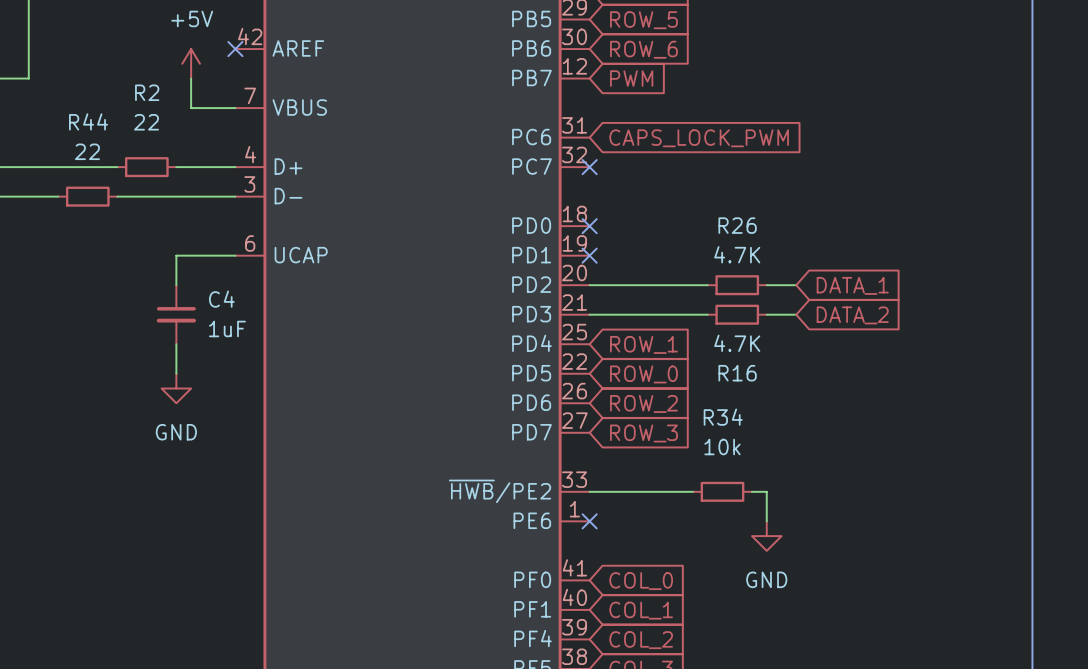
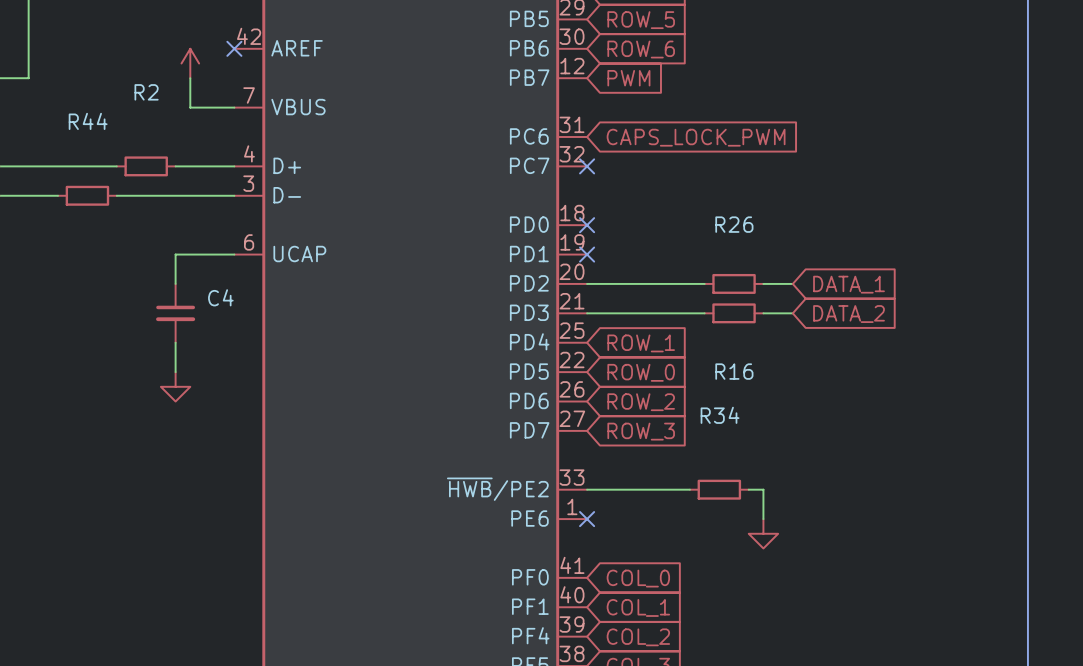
power symbol text: +5V (192, 18) -> none
R2 value: 22 (146, 122) -> none
R44 value: 22 (87, 151) -> none
R26 value: 4.7K (737, 254) -> none
C4 value: 1uF (227, 328) -> none
R16 value: 4.7K (737, 343) -> none
power symbol text: GND (176, 432) -> none
R34 value: 10k (722, 446) -> none
power symbol text: GND (766, 579) -> none

